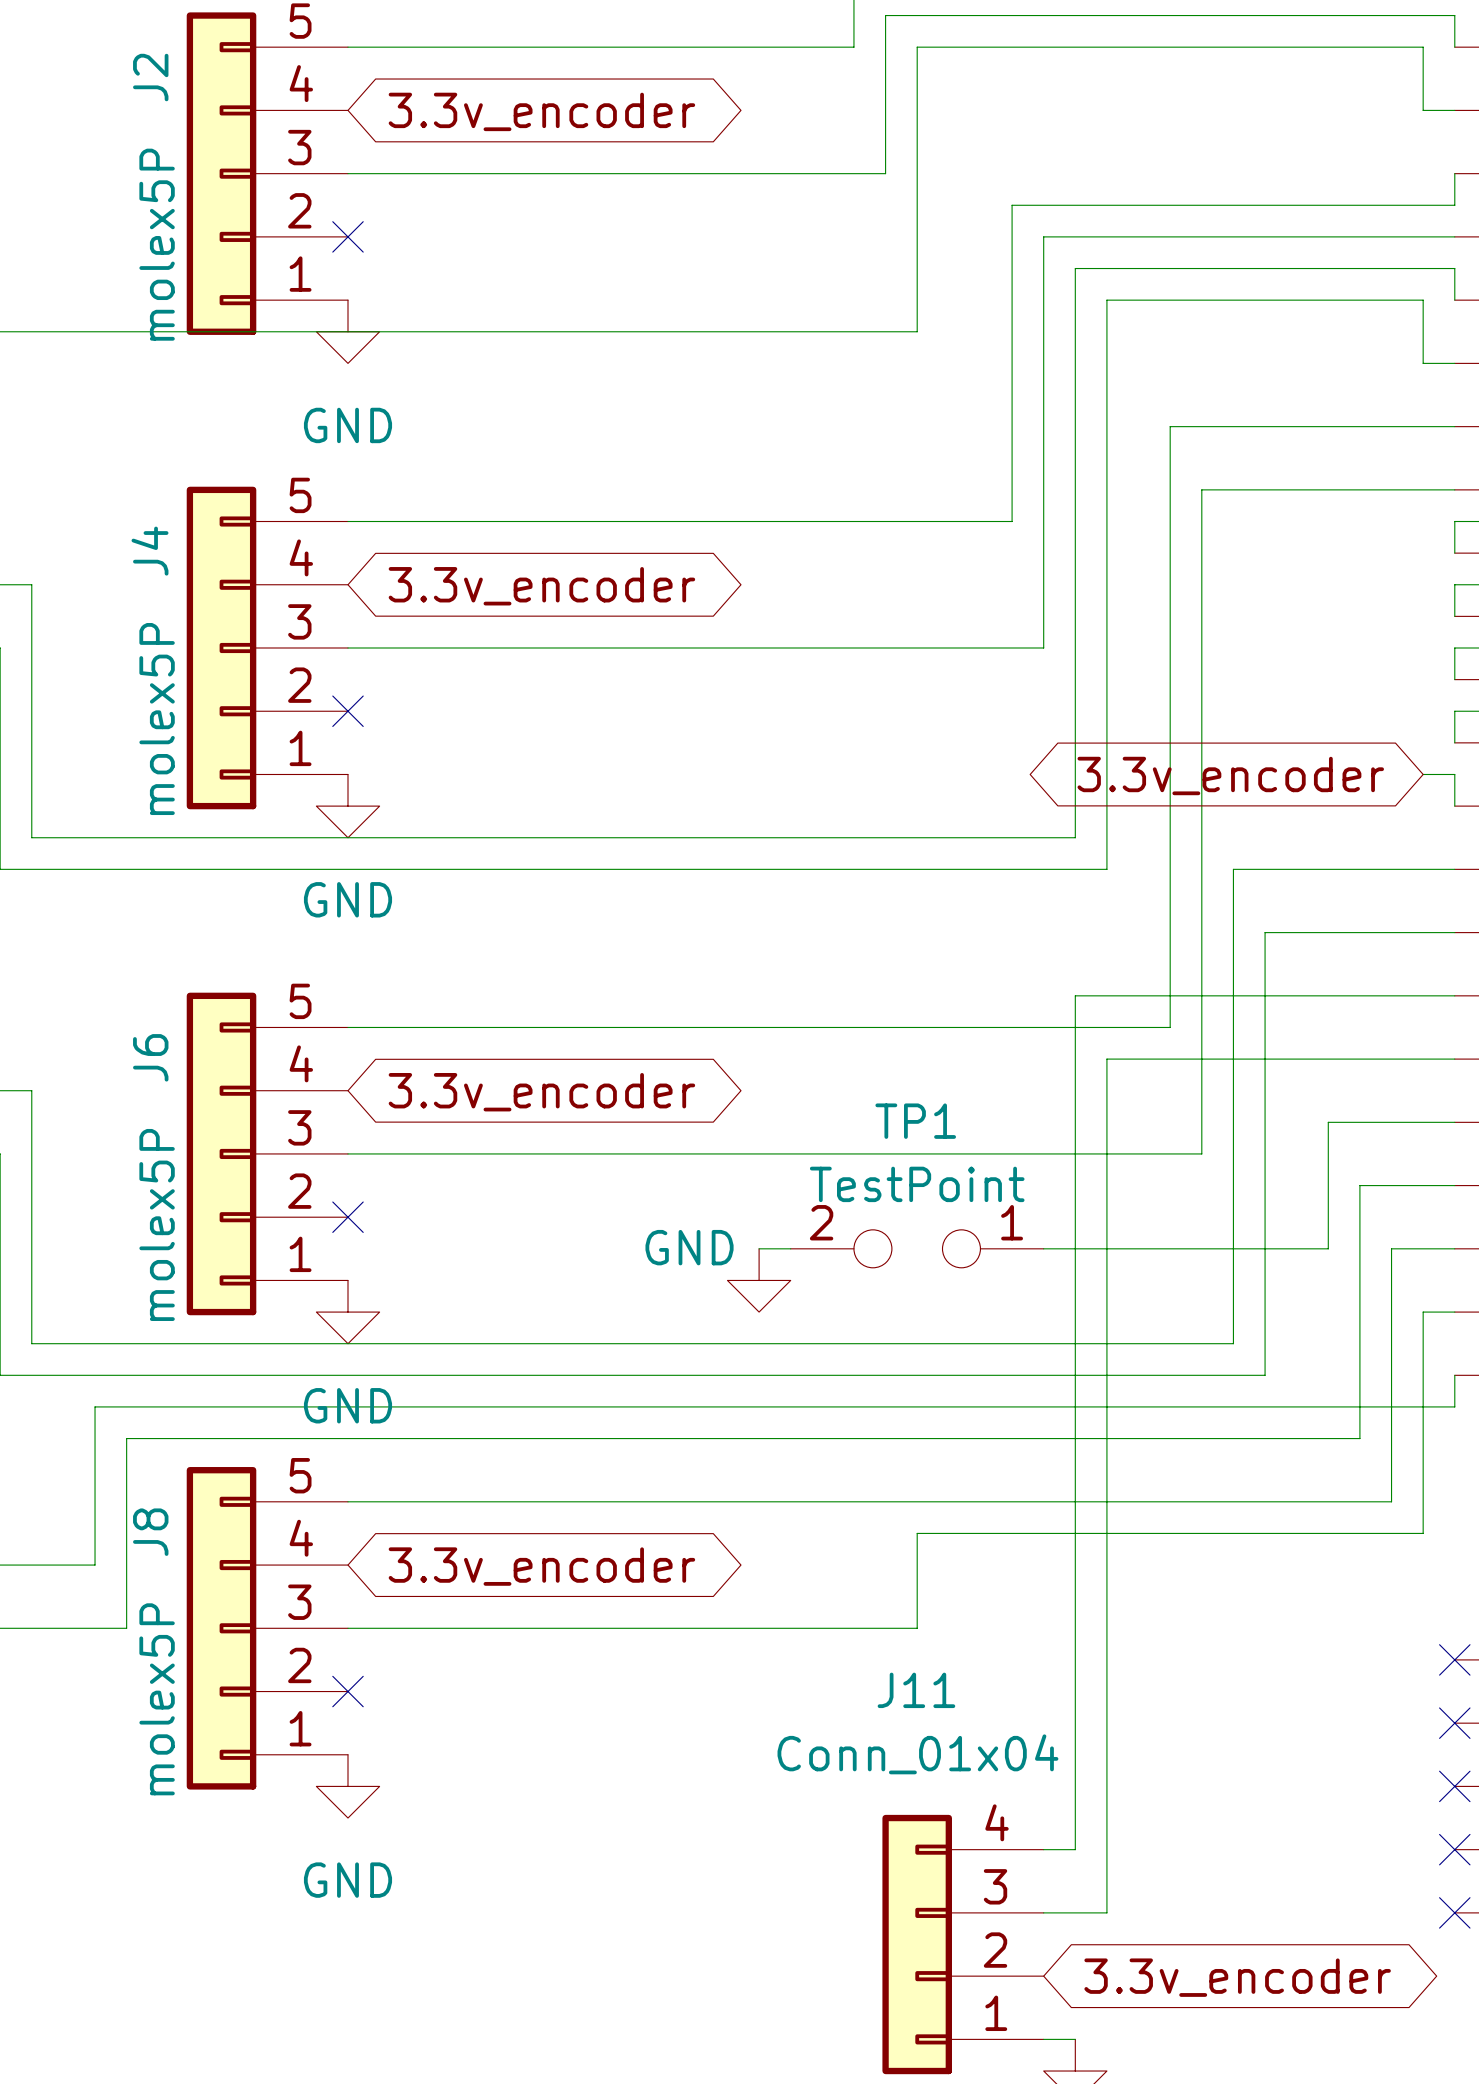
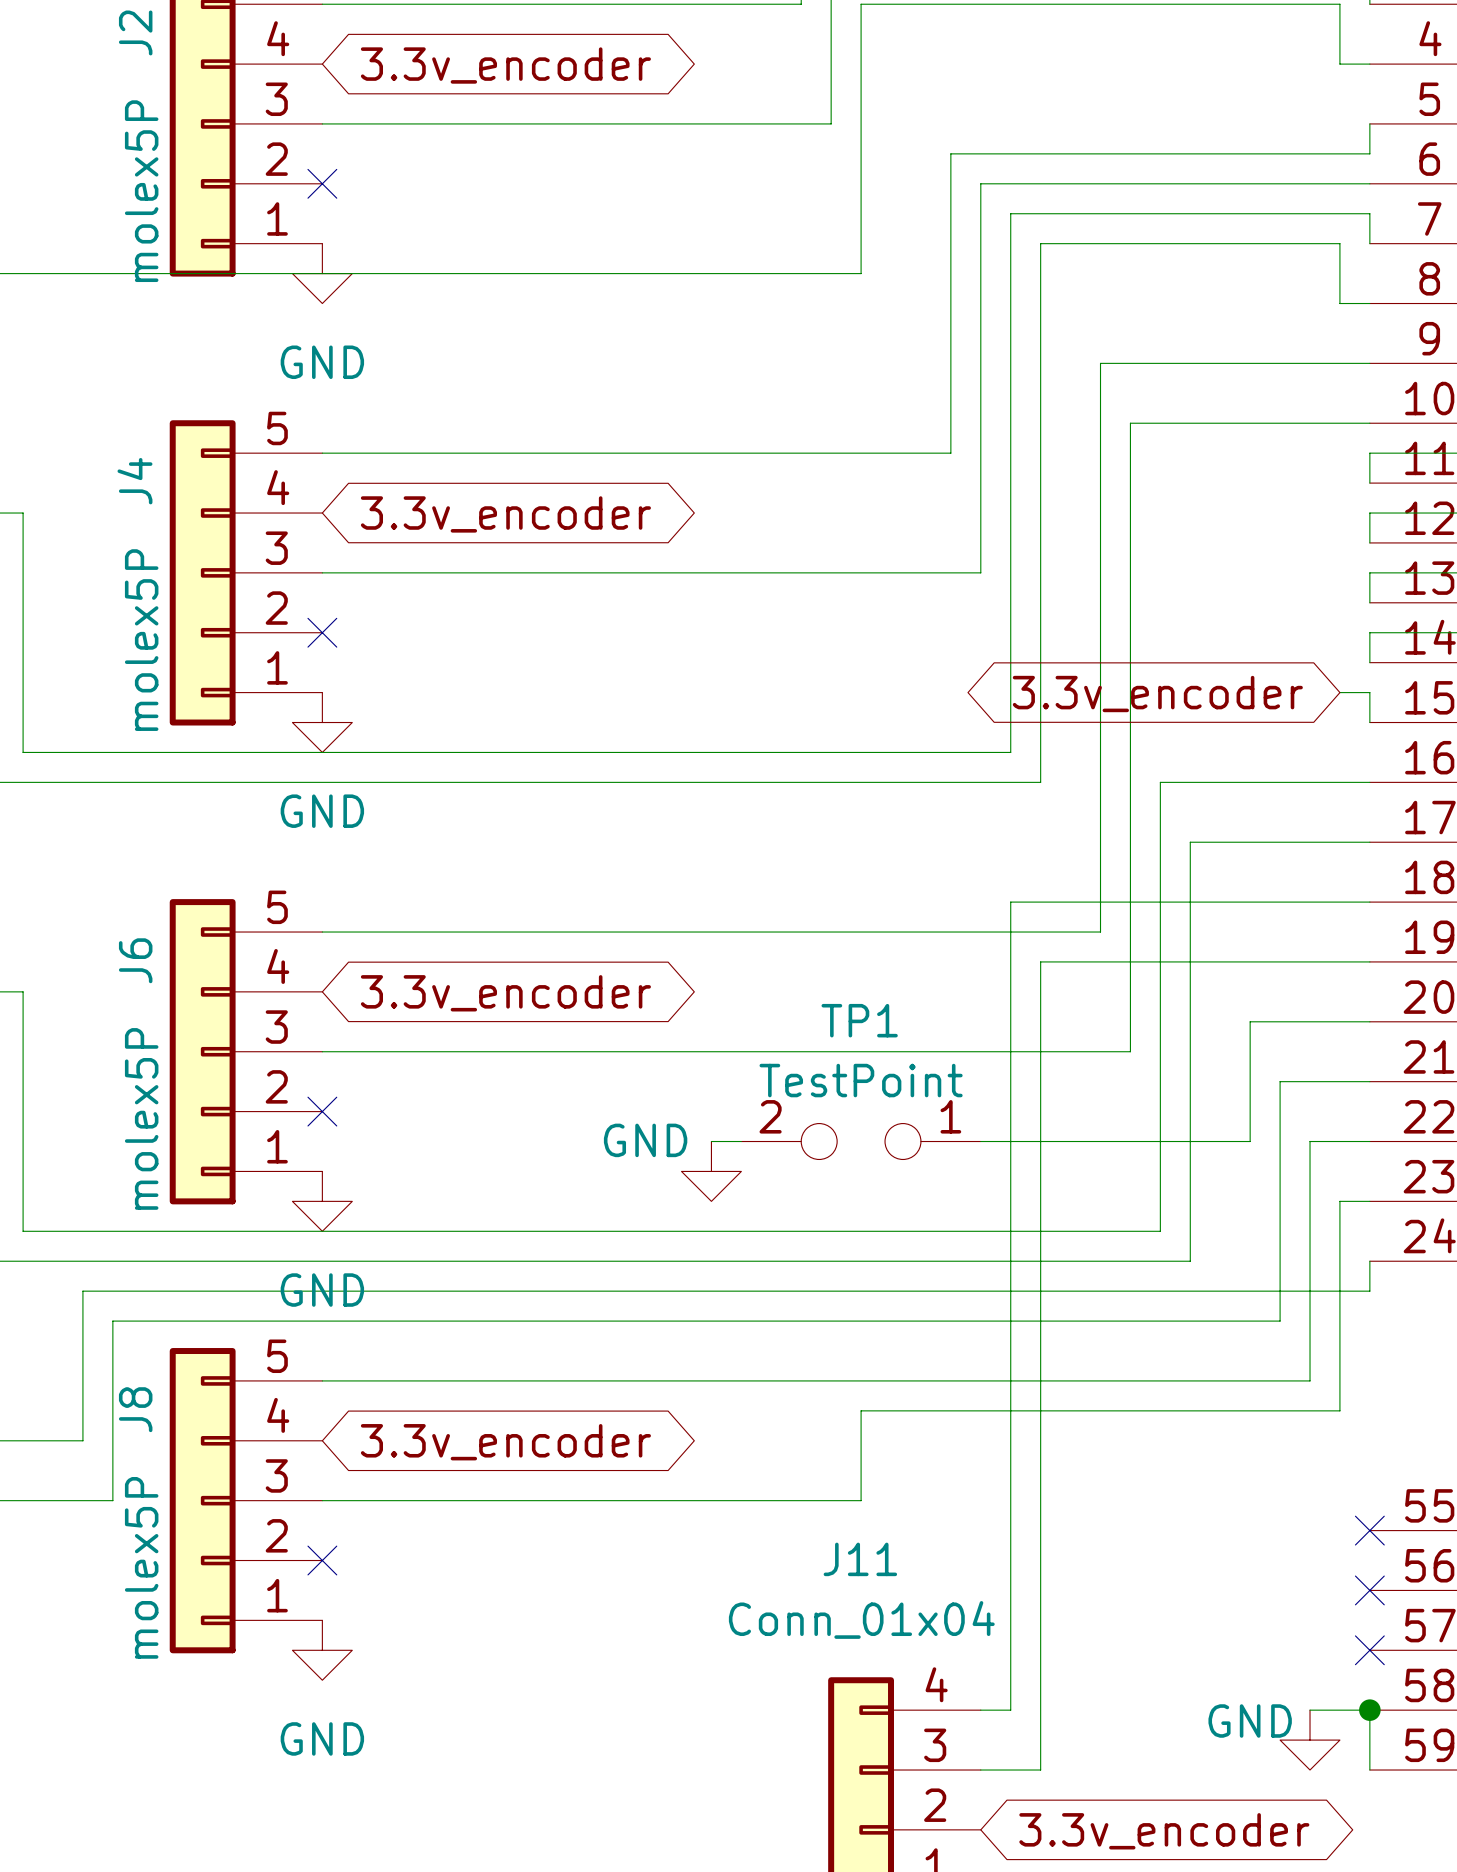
wire: none -> (1310, 1710) (1369, 1710) (1369, 1770)
no-connect mark: (1454, 1849) -> none
junction: none -> (1369, 1710)
power symbol: none -> GND (1310, 1740)
no-connect mark: (1454, 1912) -> none

